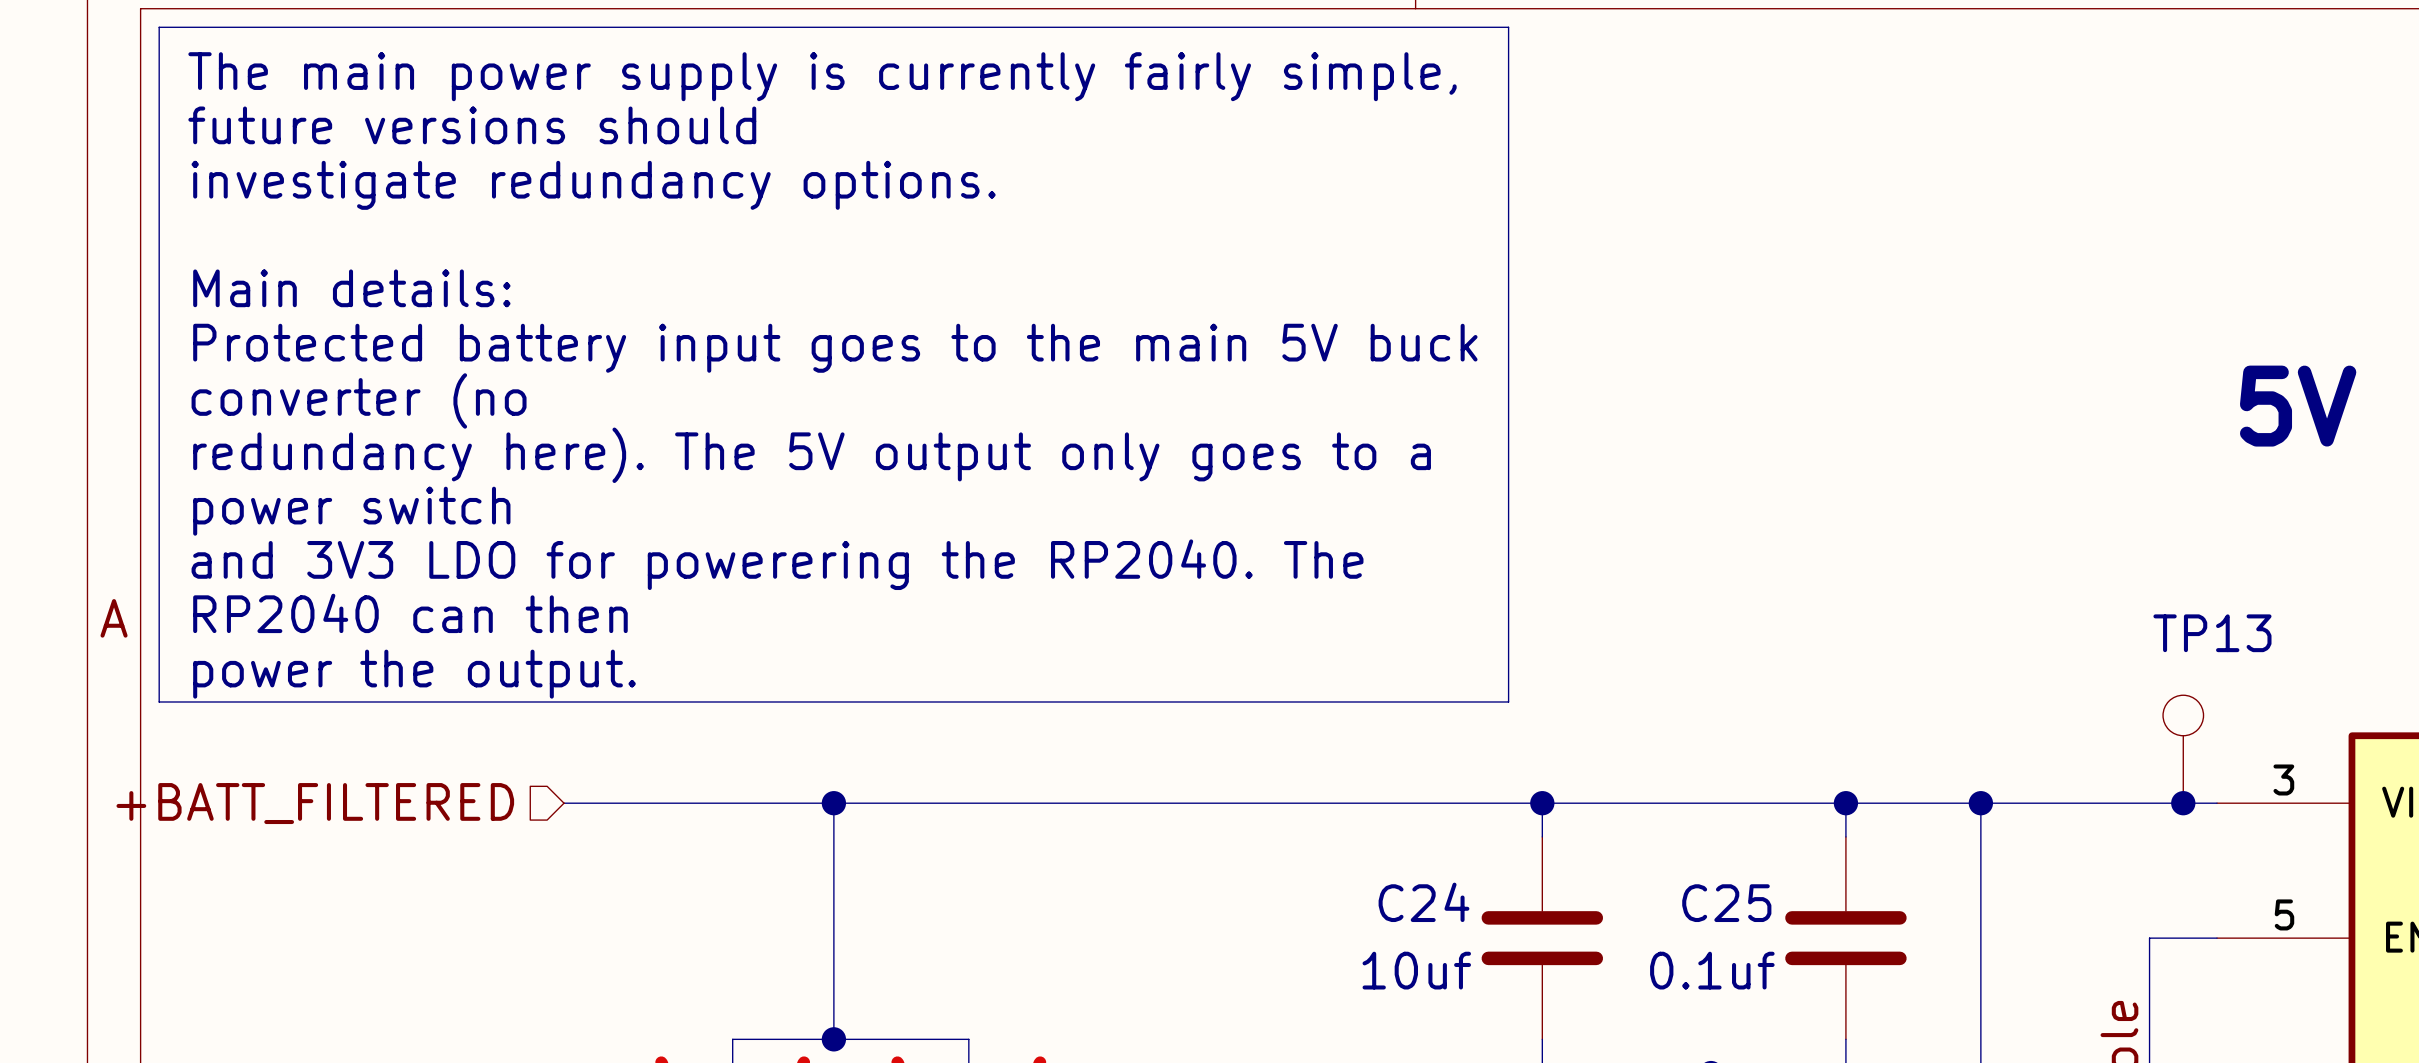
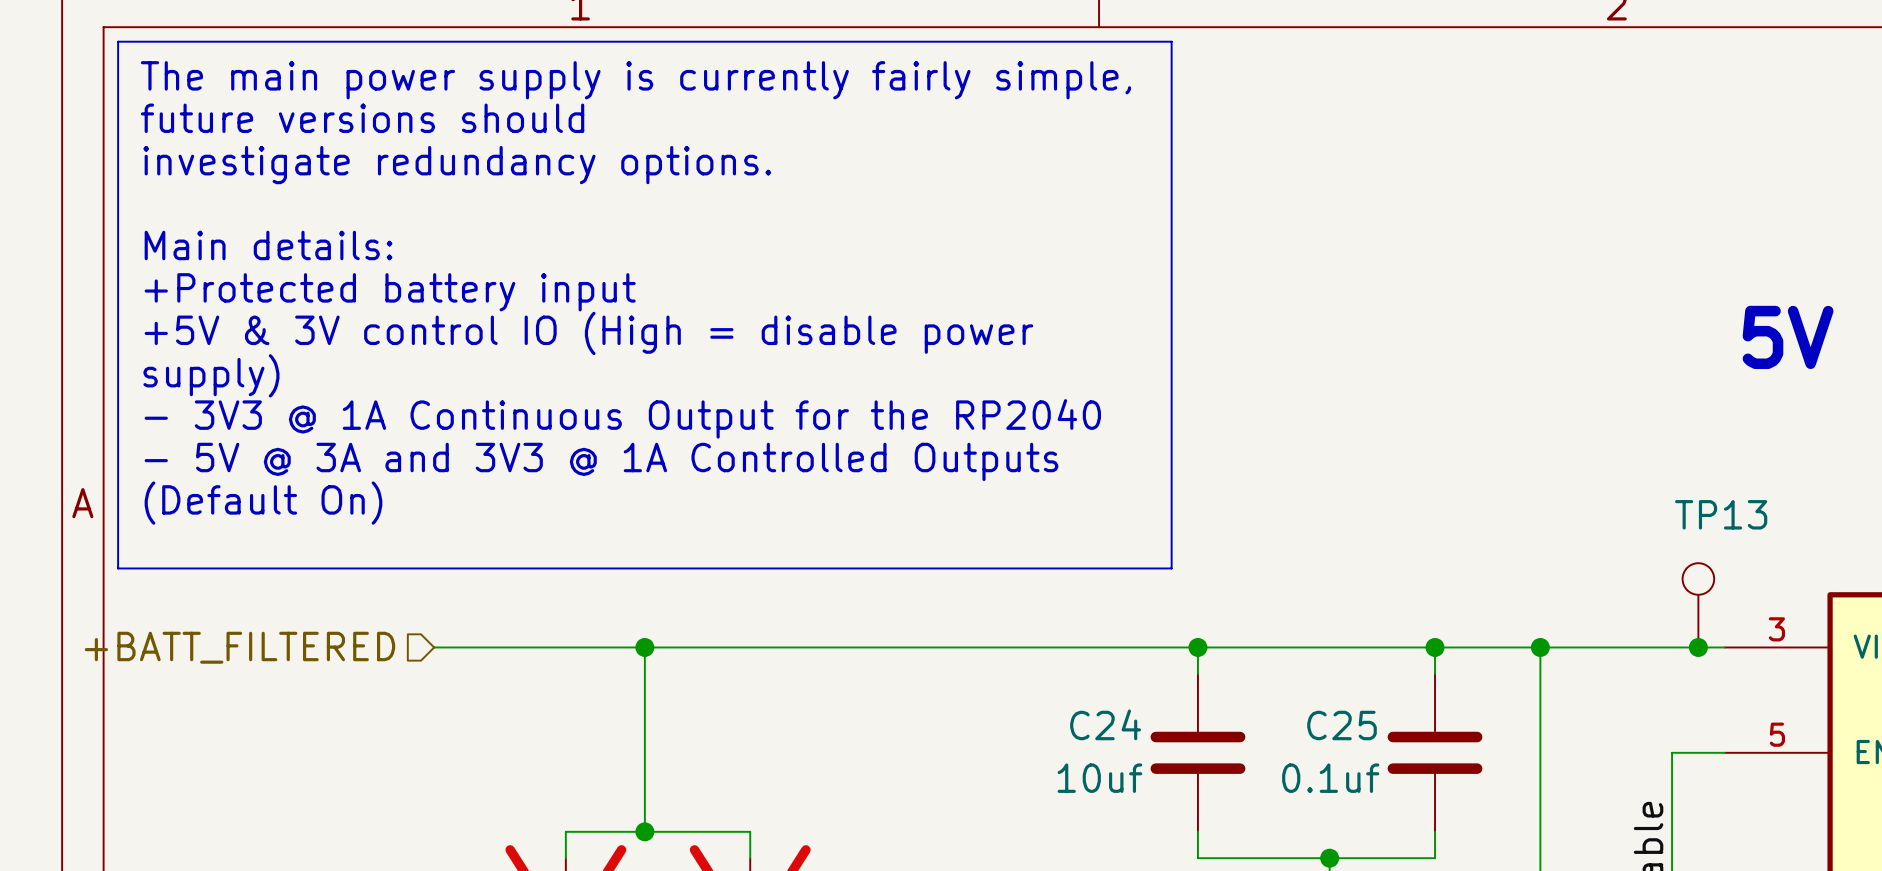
text: Protected battery input goes to the main 5V buck (835, 348) -> +Protected battery input (390, 292)
text: converter (no (359, 400) -> +5V & 3V control IO (High = disable power (588, 333)
text: redundancy here). The 5V output only goes to a (812, 455) -> supply) (211, 375)
text: power switch (351, 511) -> - 3V3 @ 1A Continuous Output for the RP2040 (622, 418)
text: and 3V3 LDO for powerering the RP2040. The (777, 564) -> - 5V @ 3A and 3V3 @ 1A Controlled Outputs (601, 461)
text: RP2040 can then (410, 613) -> (Default On) (263, 503)
text: power the output. (414, 674) -> none

